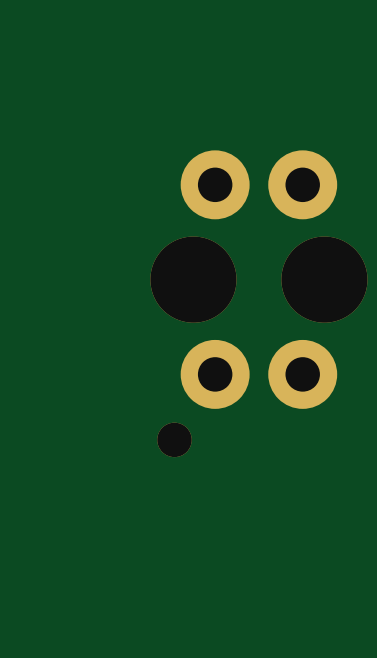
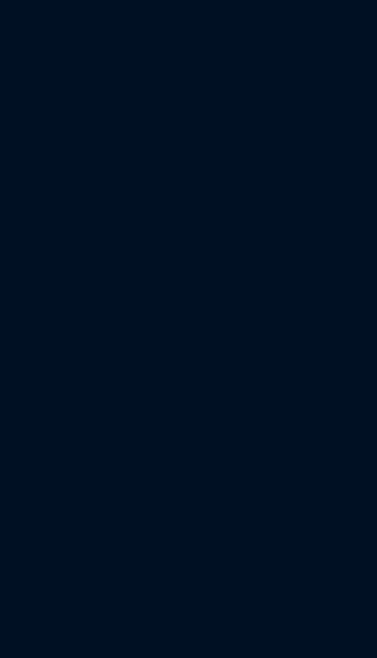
part: (258, 303) -> none

